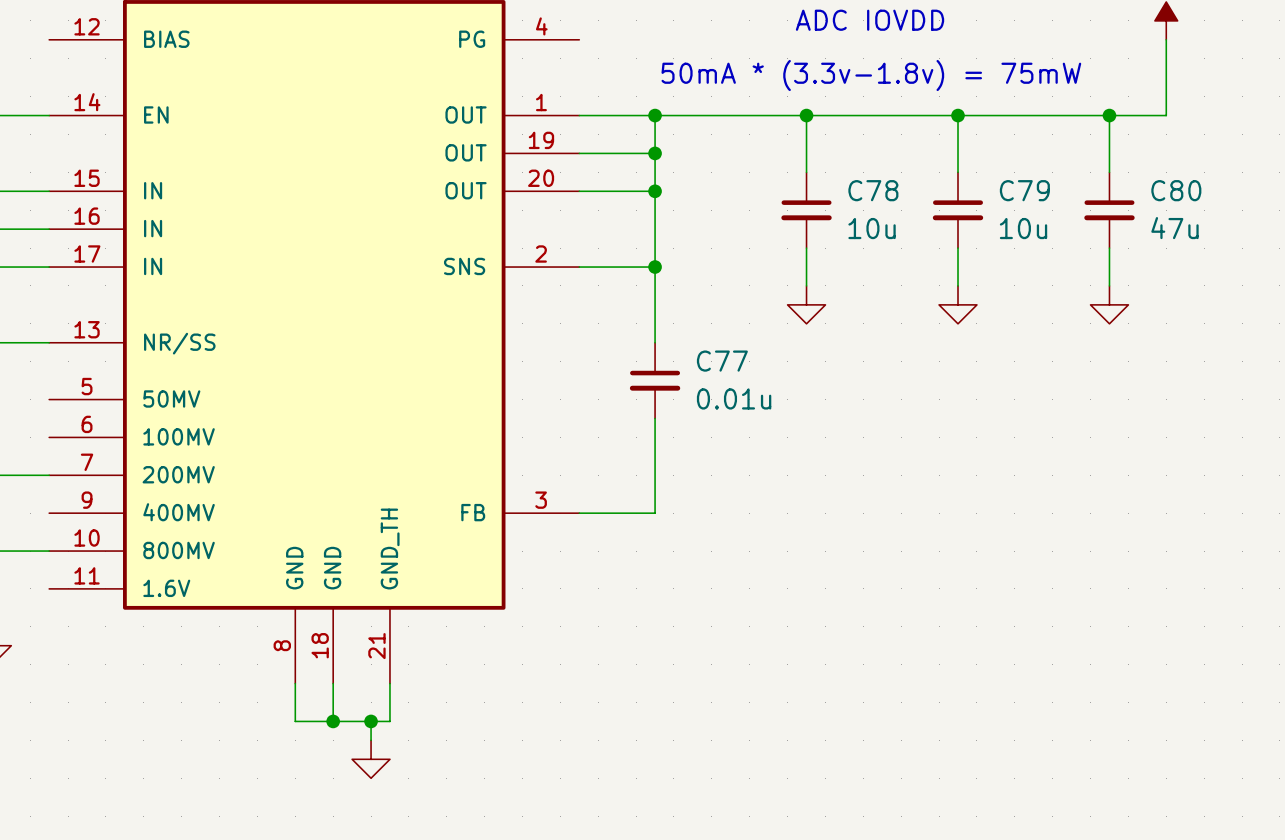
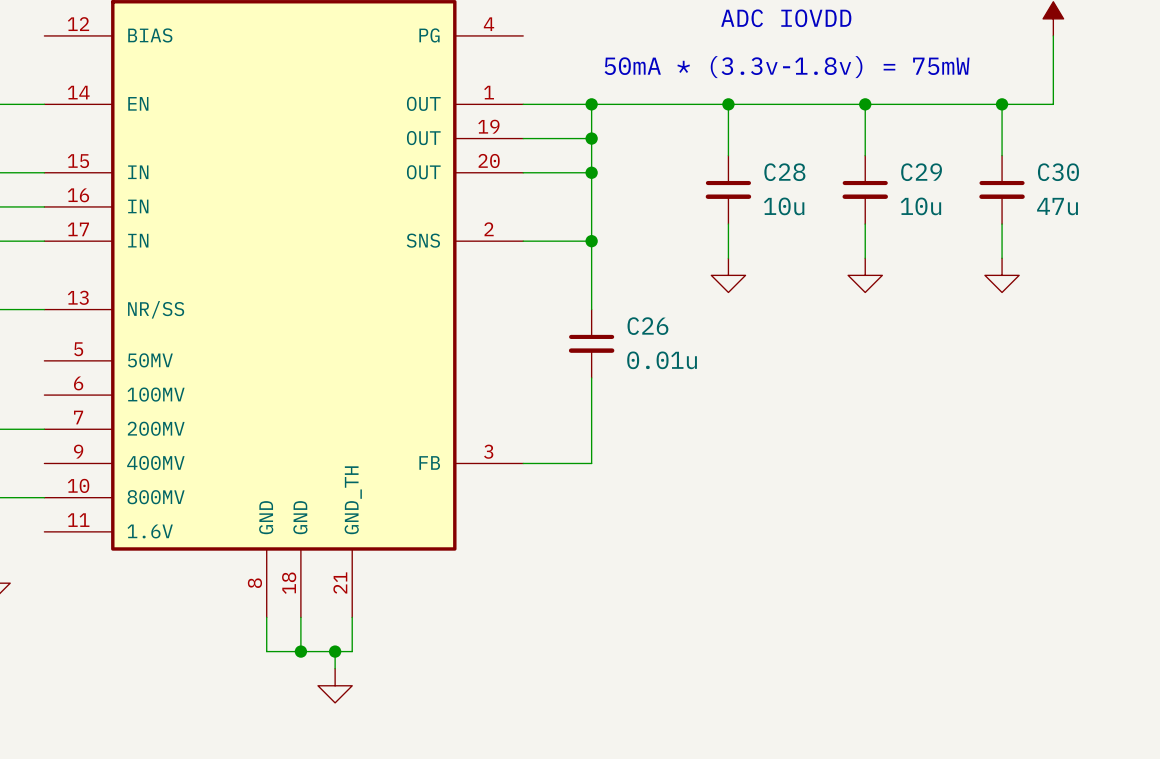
C78 name: C78 (873, 190) -> C28 (784, 172)
C79 name: C79 (1024, 190) -> C29 (921, 172)
C80 name: C80 (1176, 190) -> C30 (1058, 172)
C77 name: C77 (722, 361) -> C26 (647, 326)

